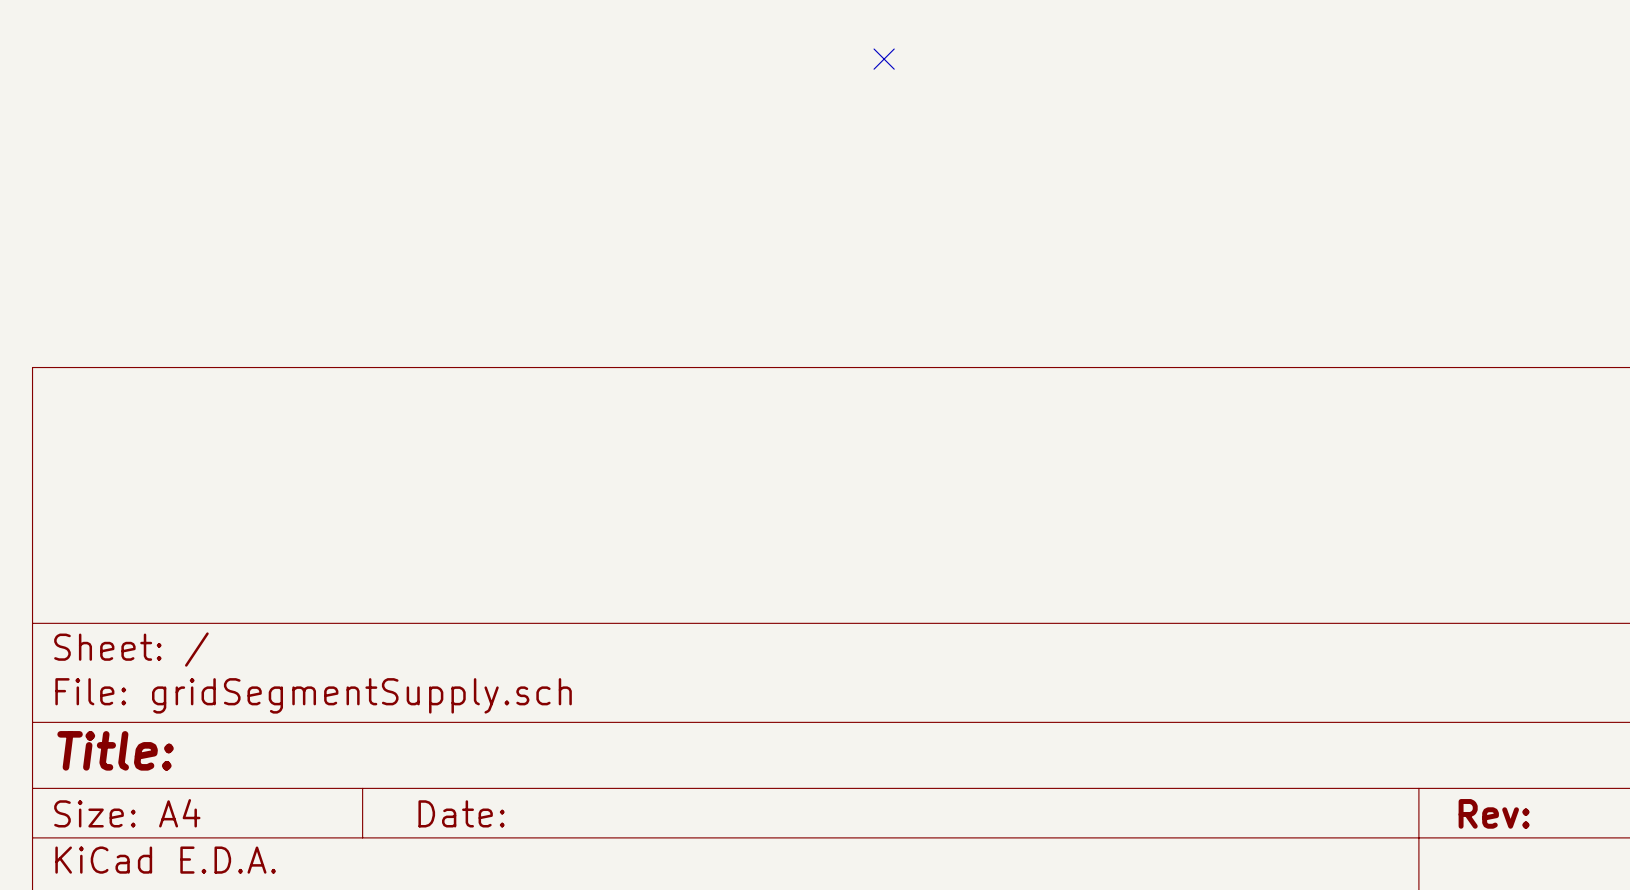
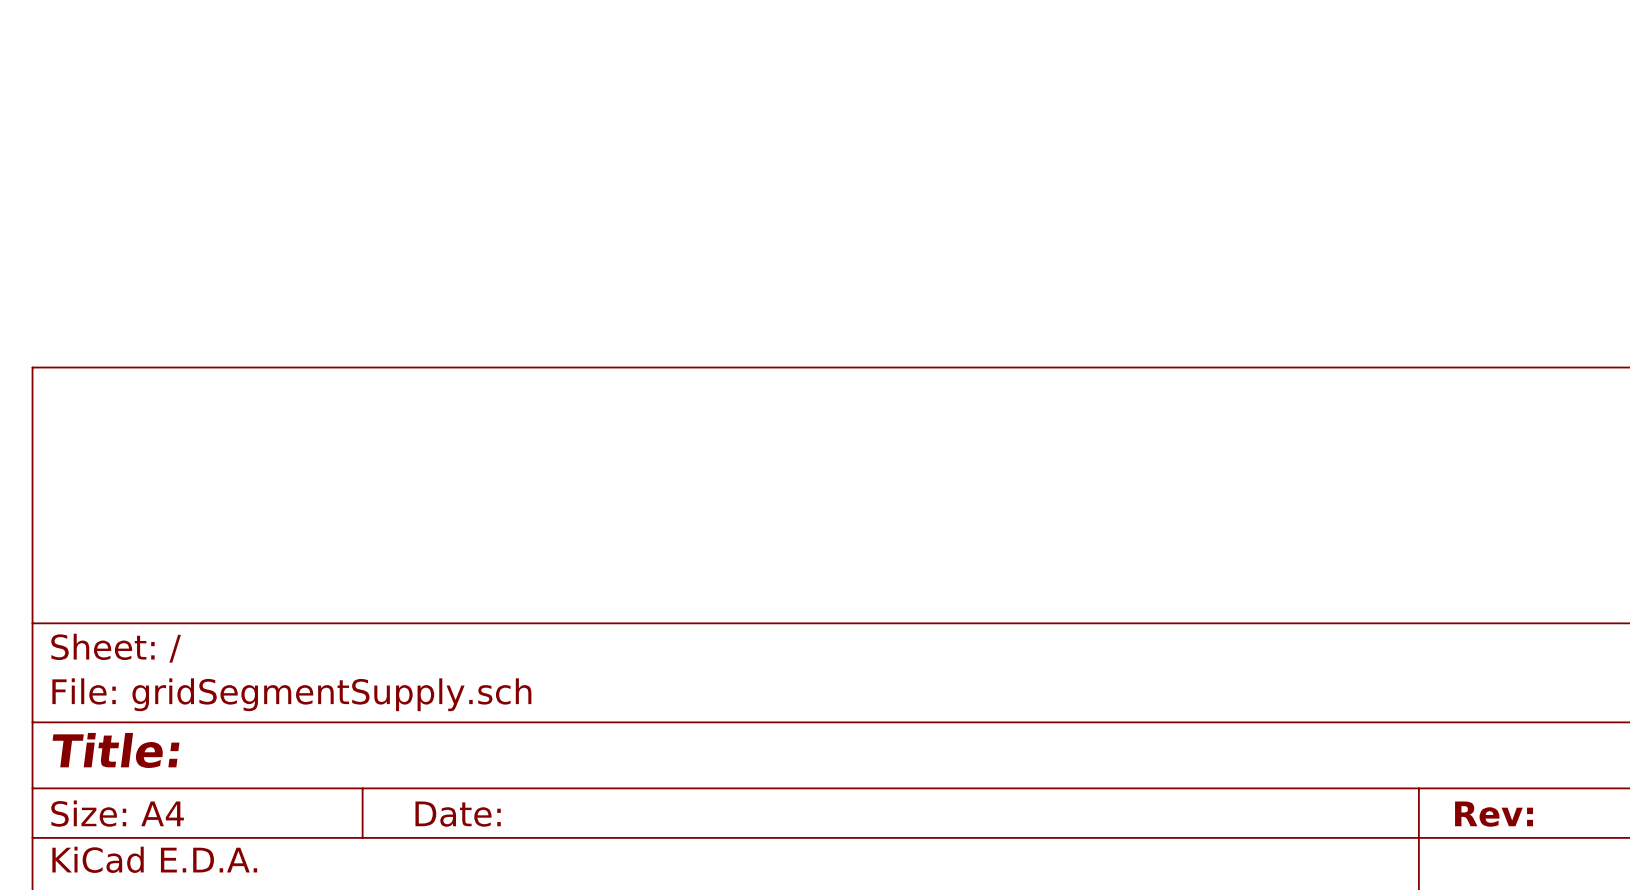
no-connect mark: (884, 59) -> none

